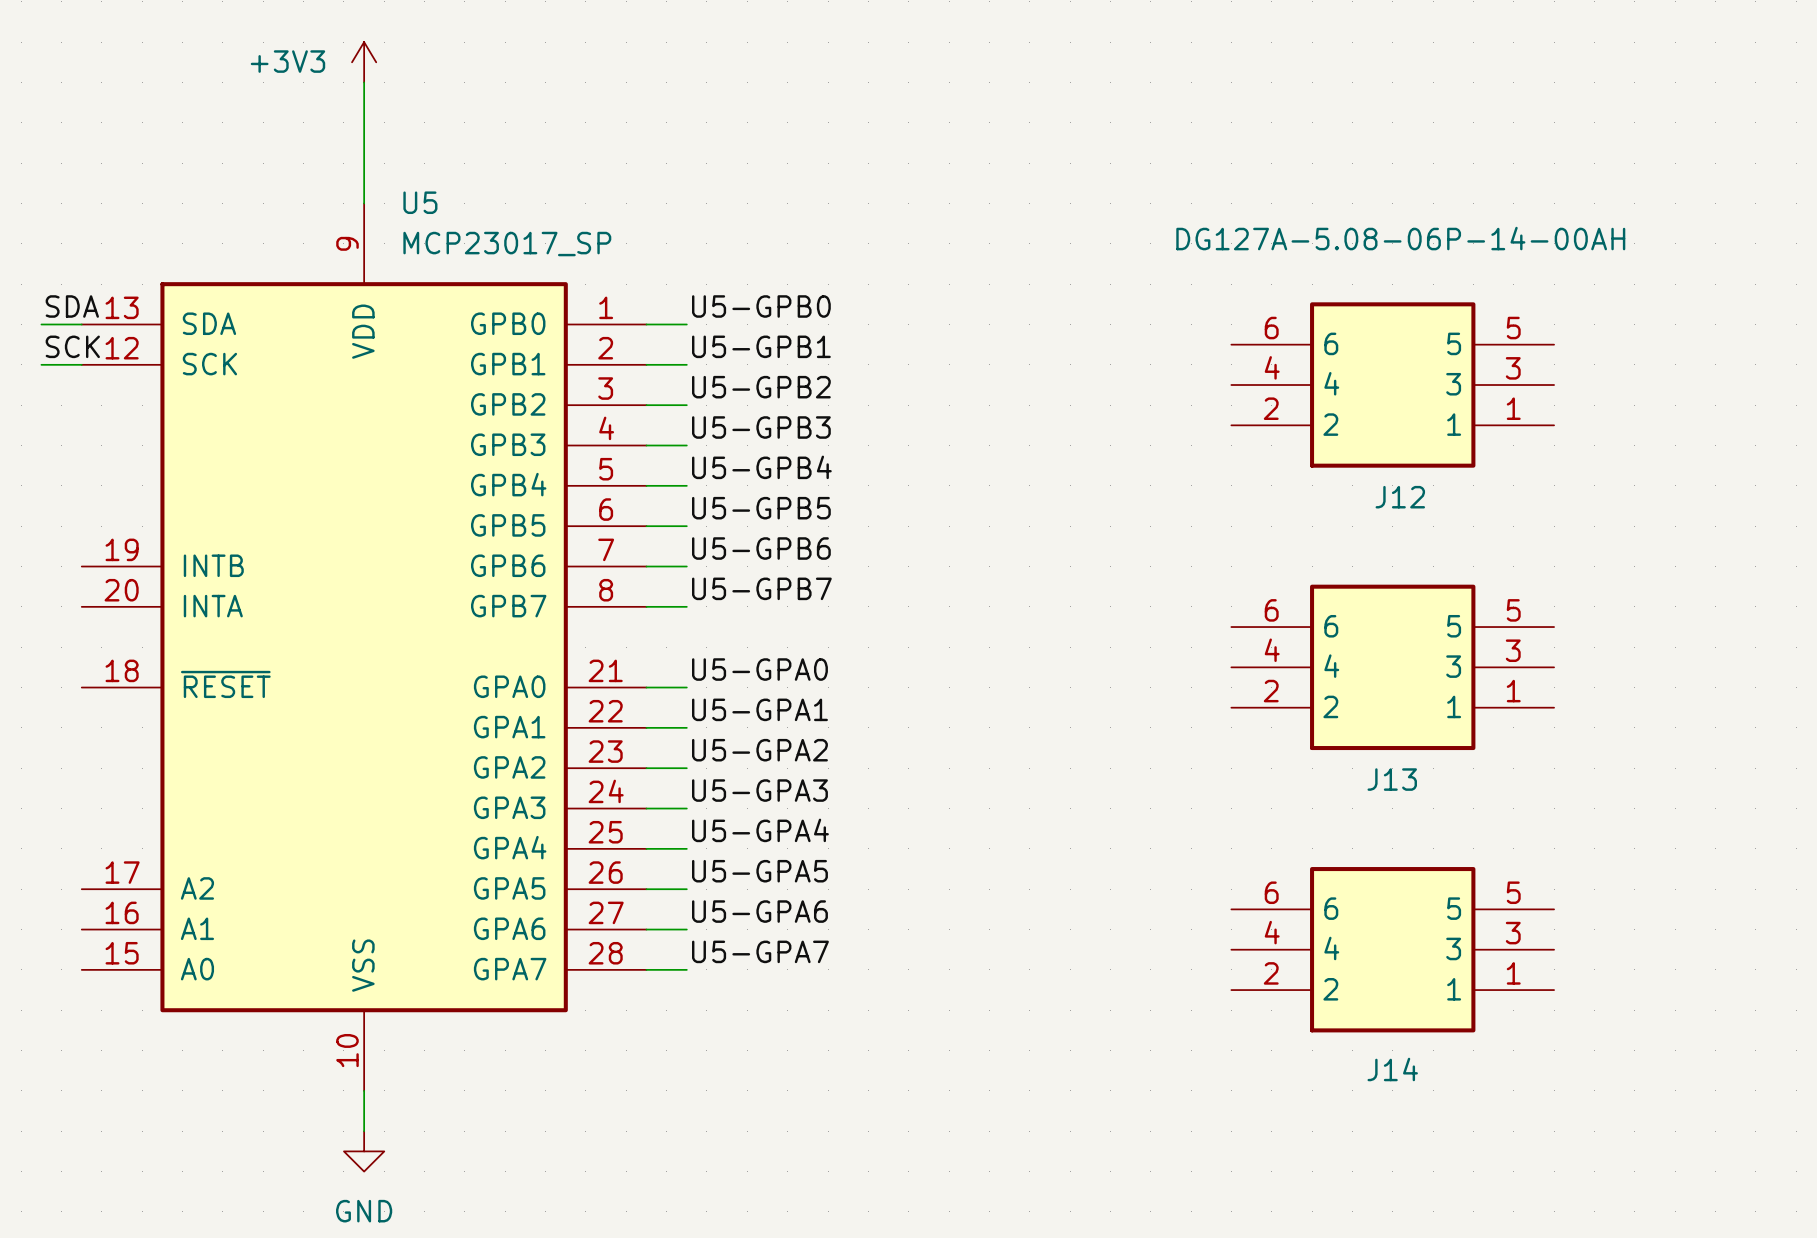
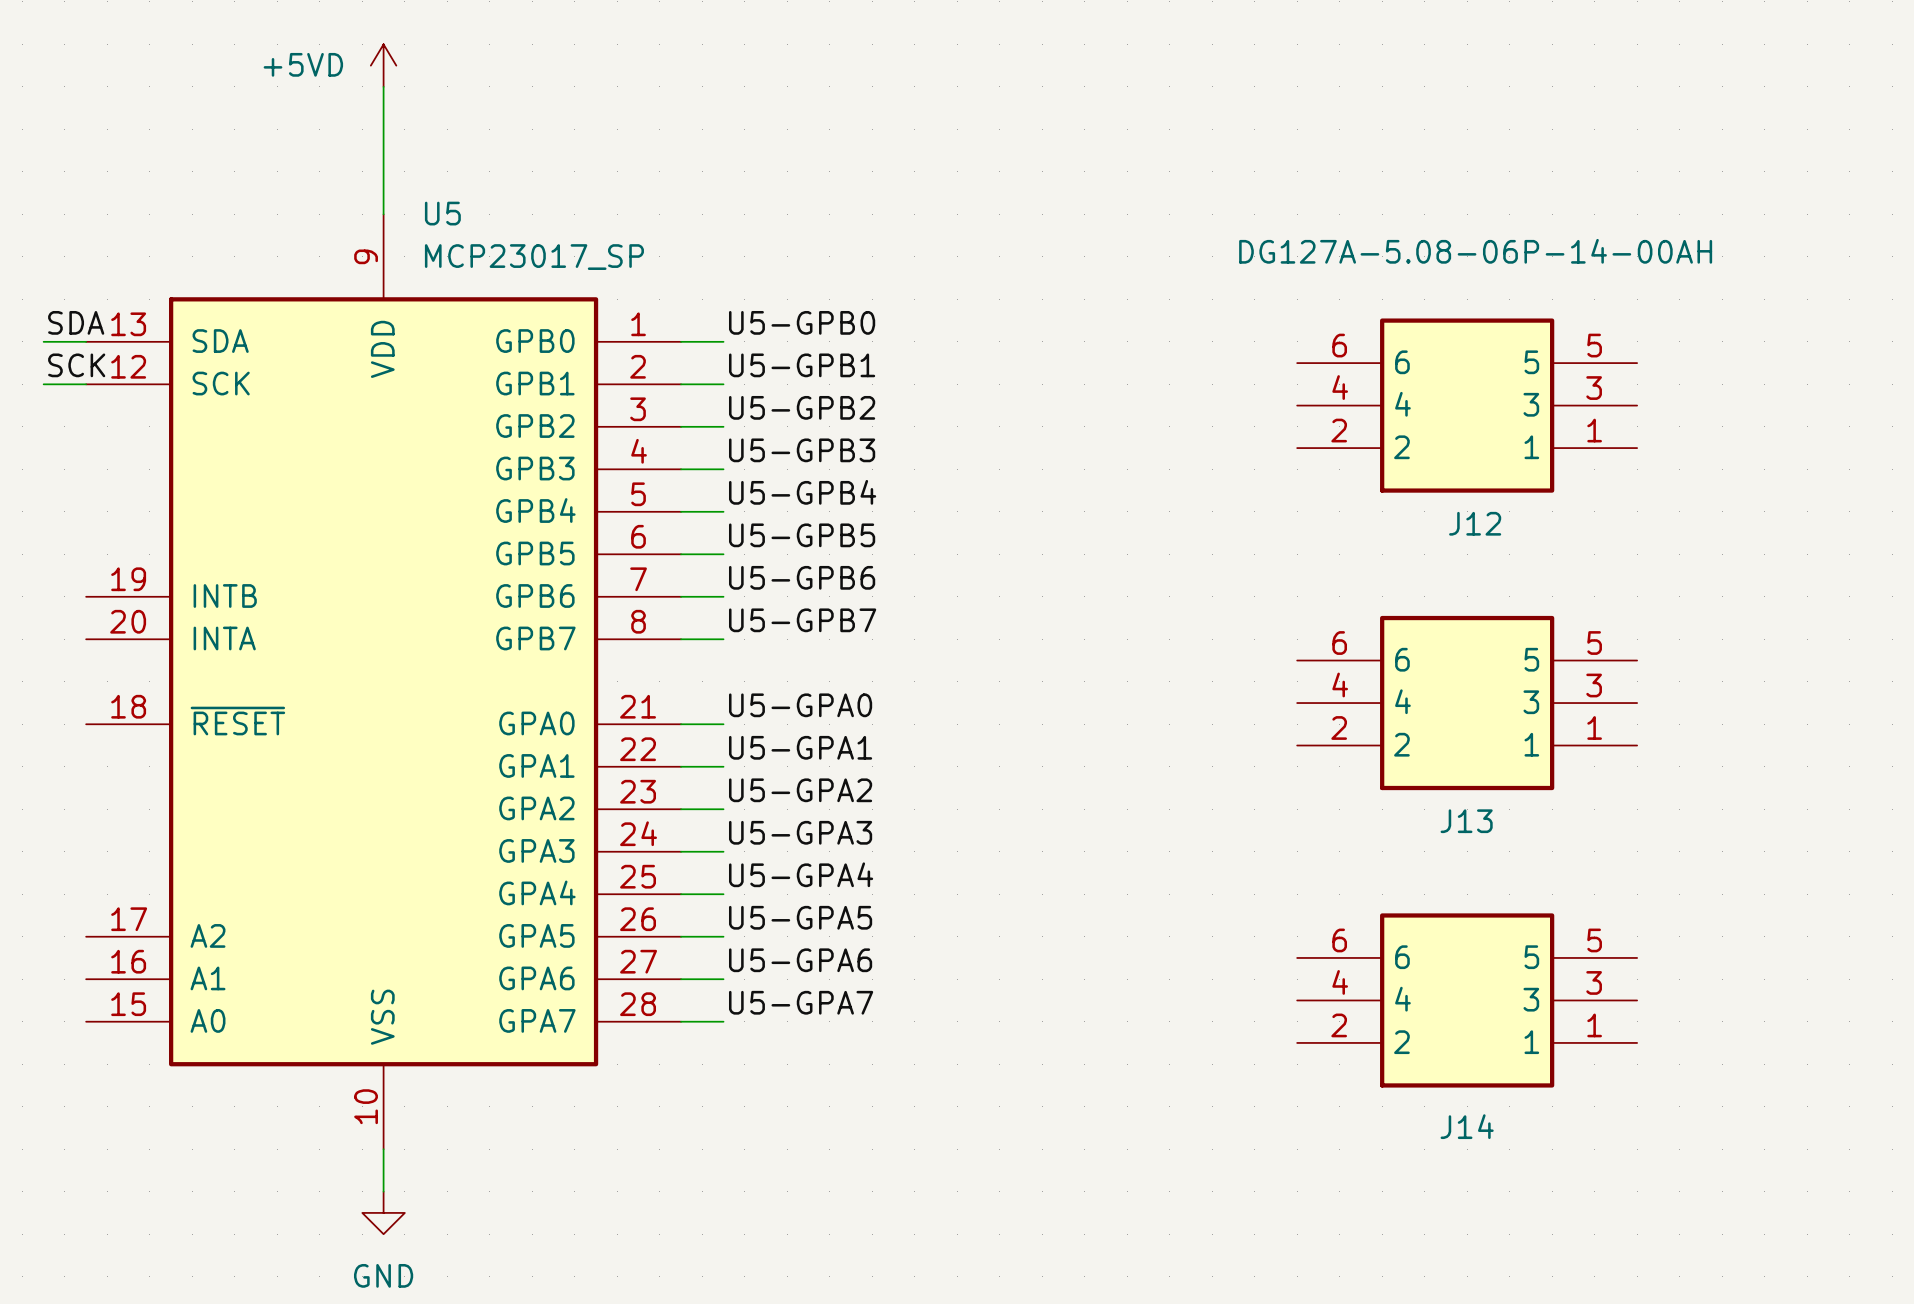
power symbol: +3V3 (364, 62) -> +5VD (383, 65)

